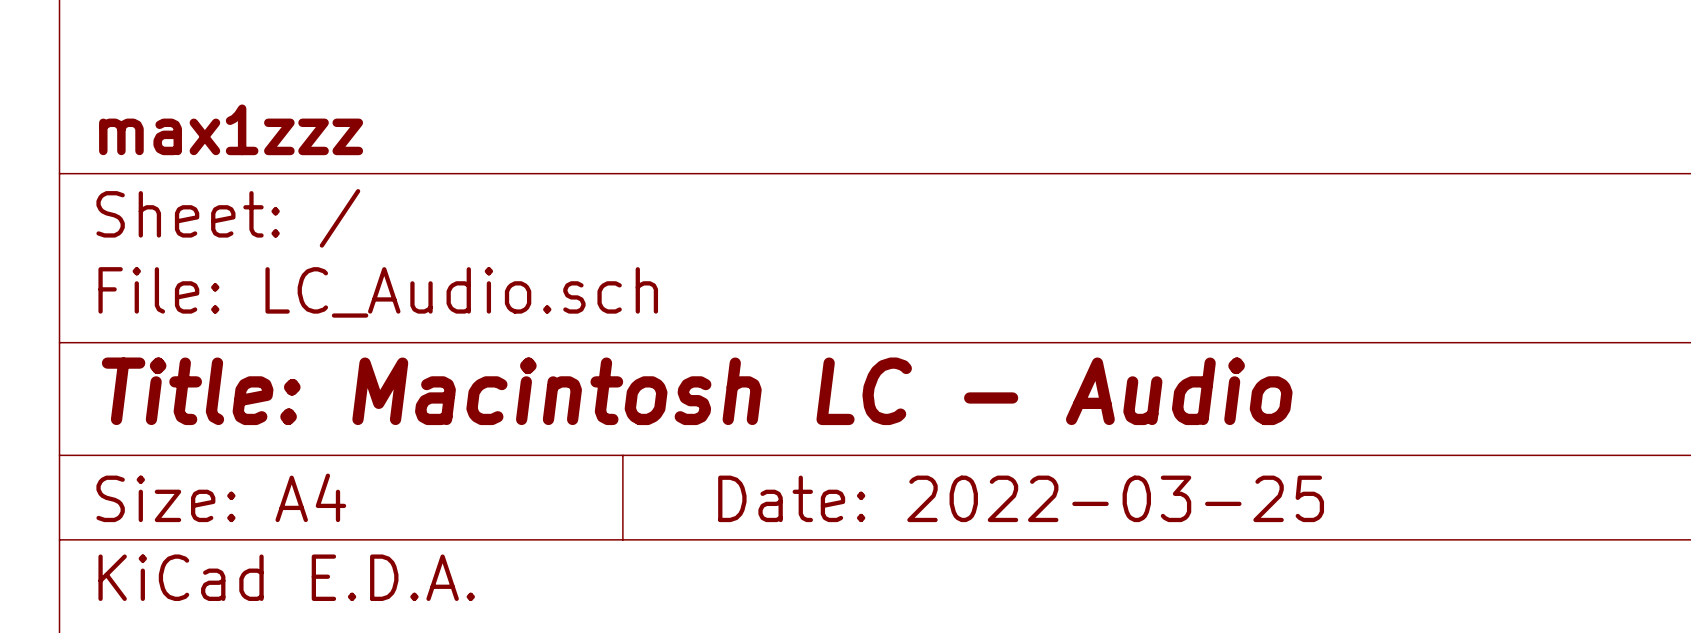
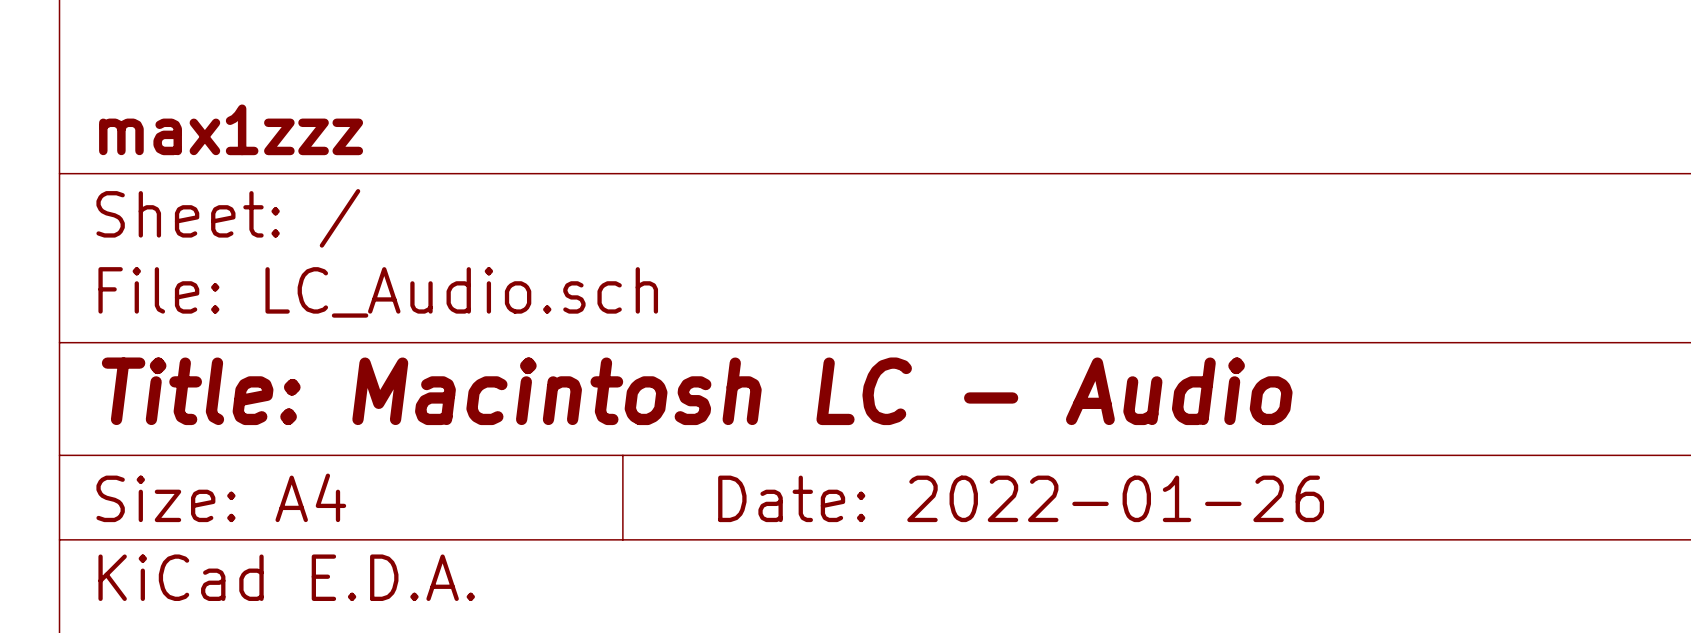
title block: Date: 2022-03-25 (1021, 498) -> Date: 2022-01-26 (1021, 498)

